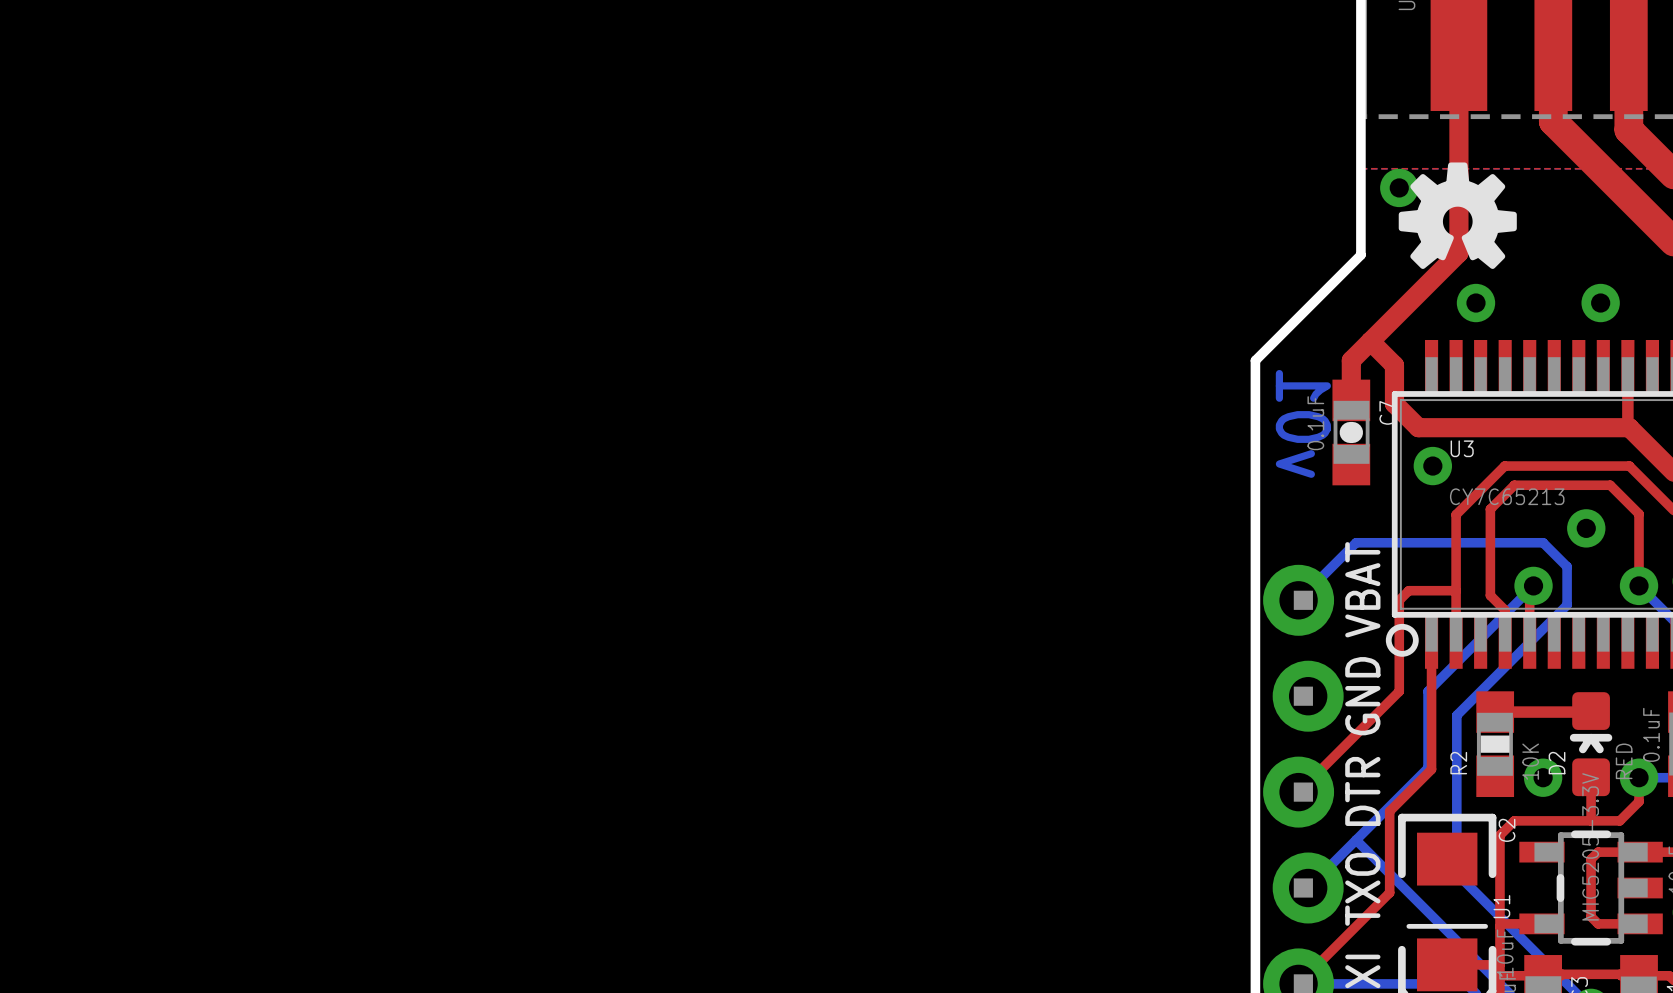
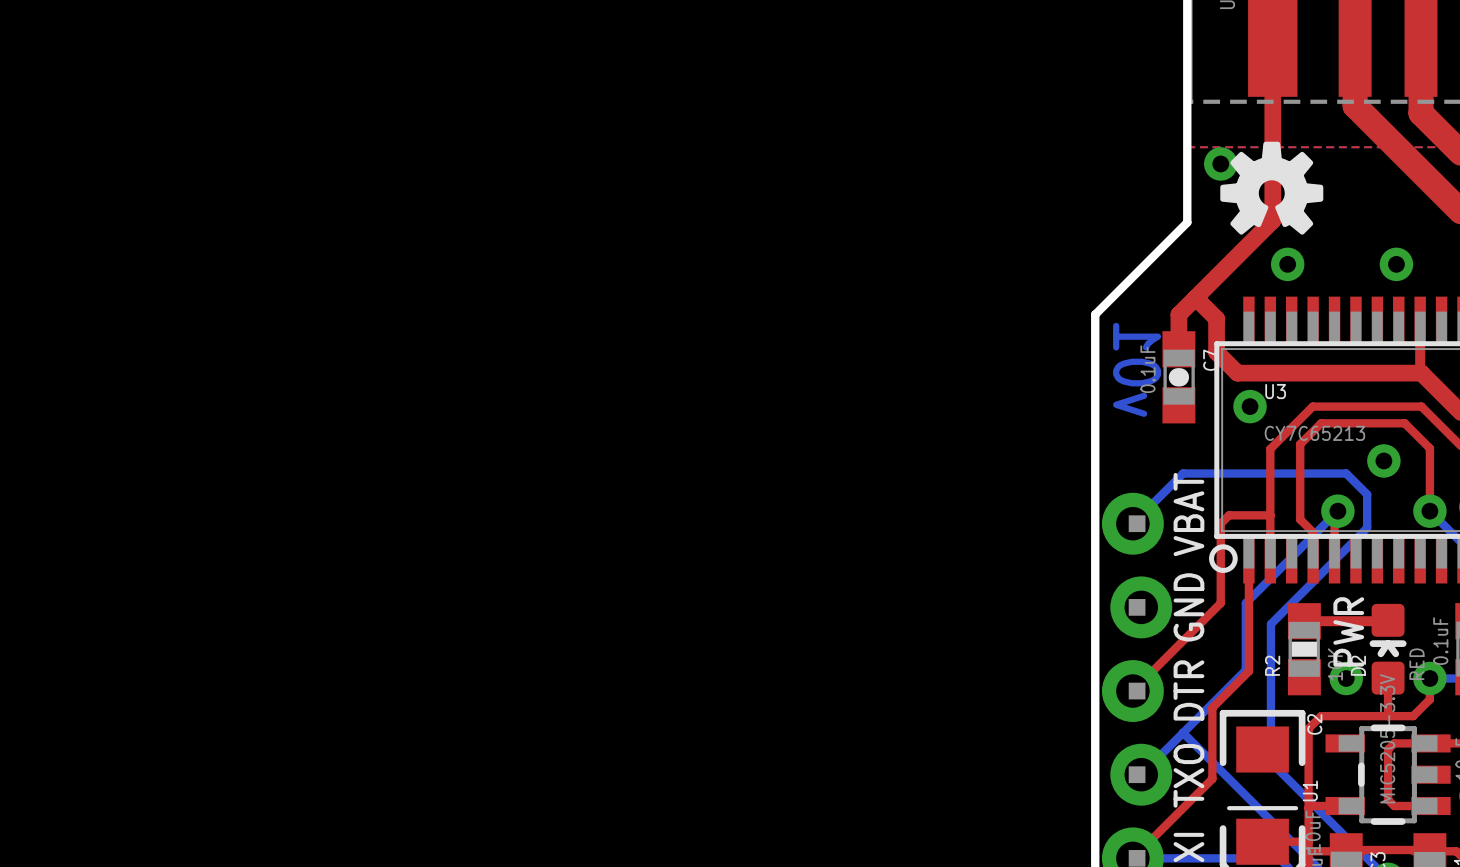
text: none -> PWR (1348, 631)

